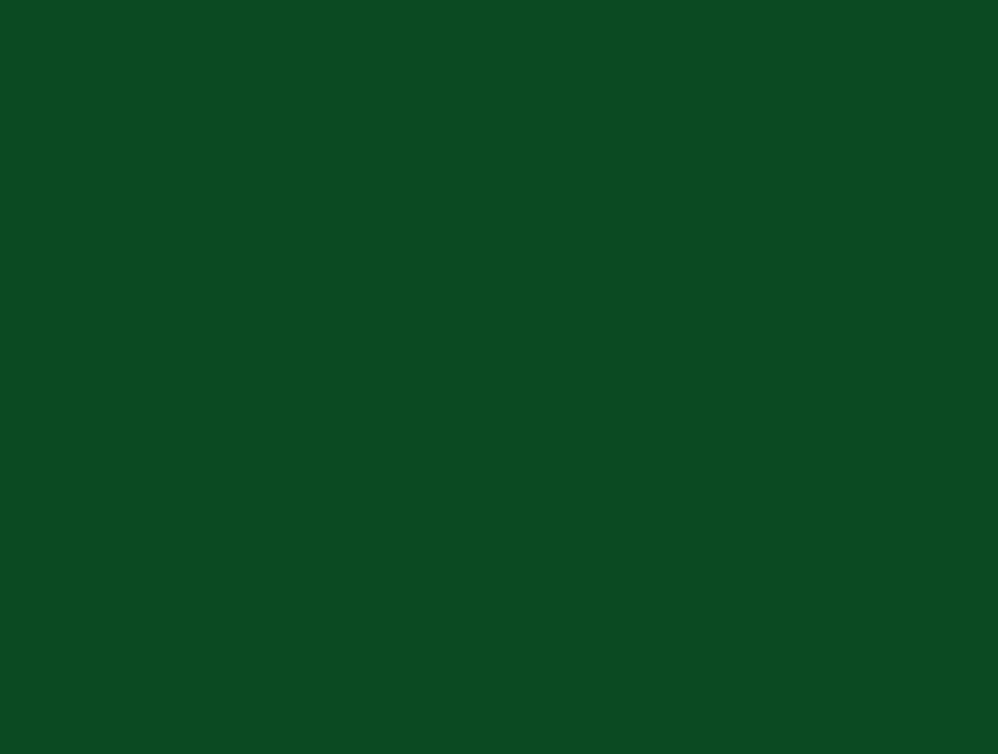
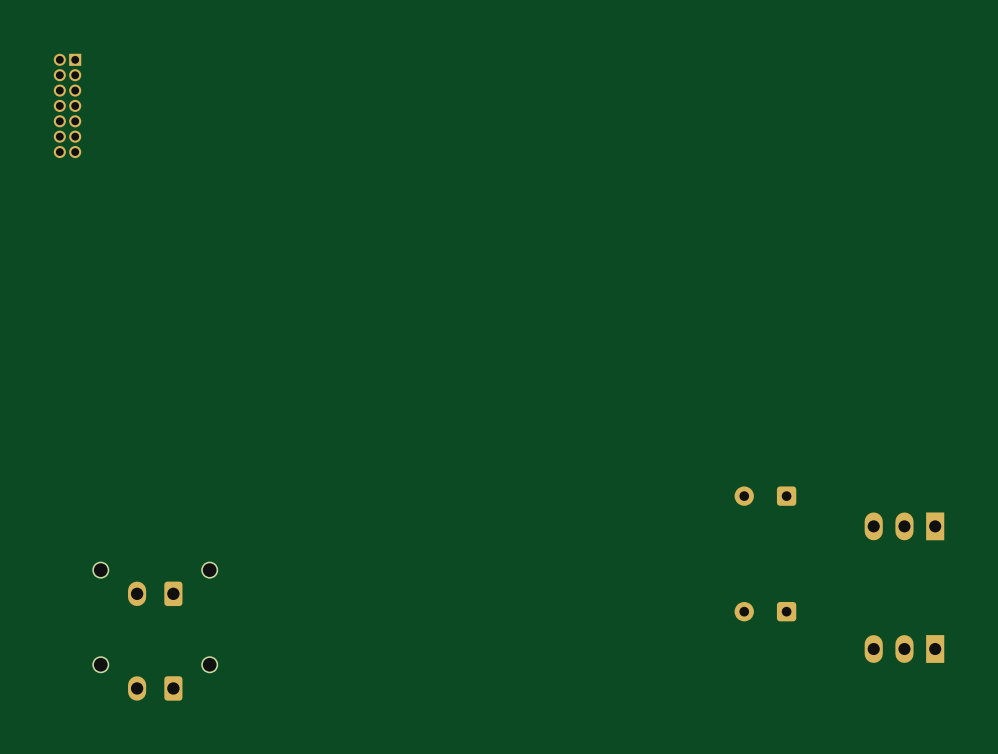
part: none -> (67, 105)
part: none -> (765, 496)
part: none -> (904, 526)
part: none -> (155, 584)
part: none -> (765, 611)
part: none -> (904, 649)
part: none -> (155, 678)

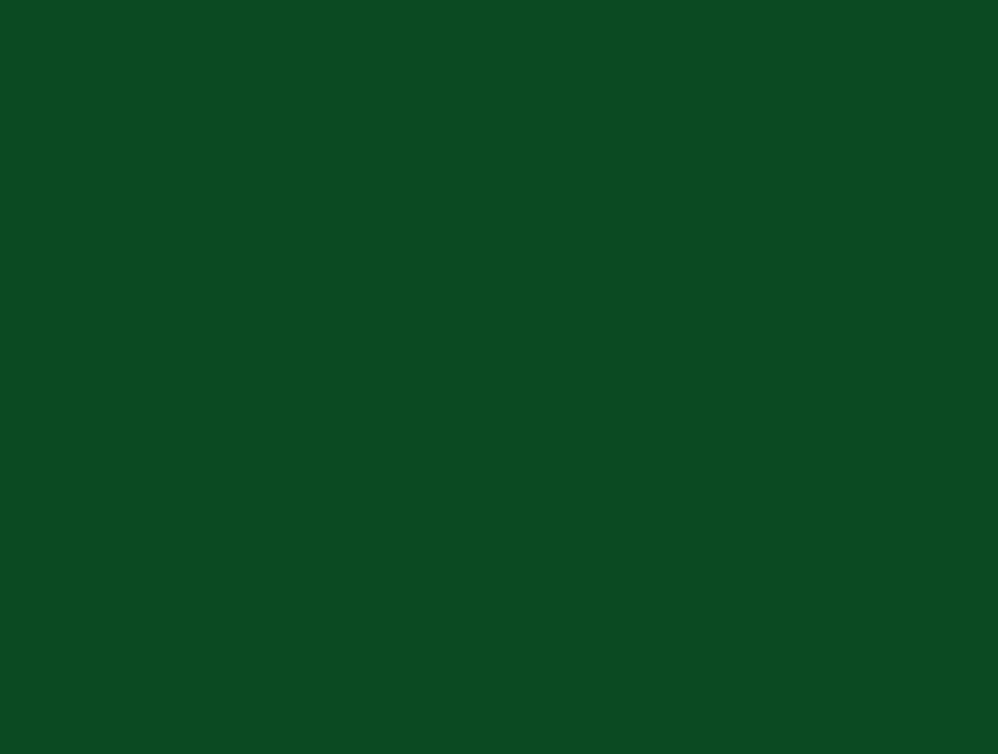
part: (67, 105) -> none
part: (765, 496) -> none
part: (904, 526) -> none
part: (155, 584) -> none
part: (765, 611) -> none
part: (904, 649) -> none
part: (155, 678) -> none

